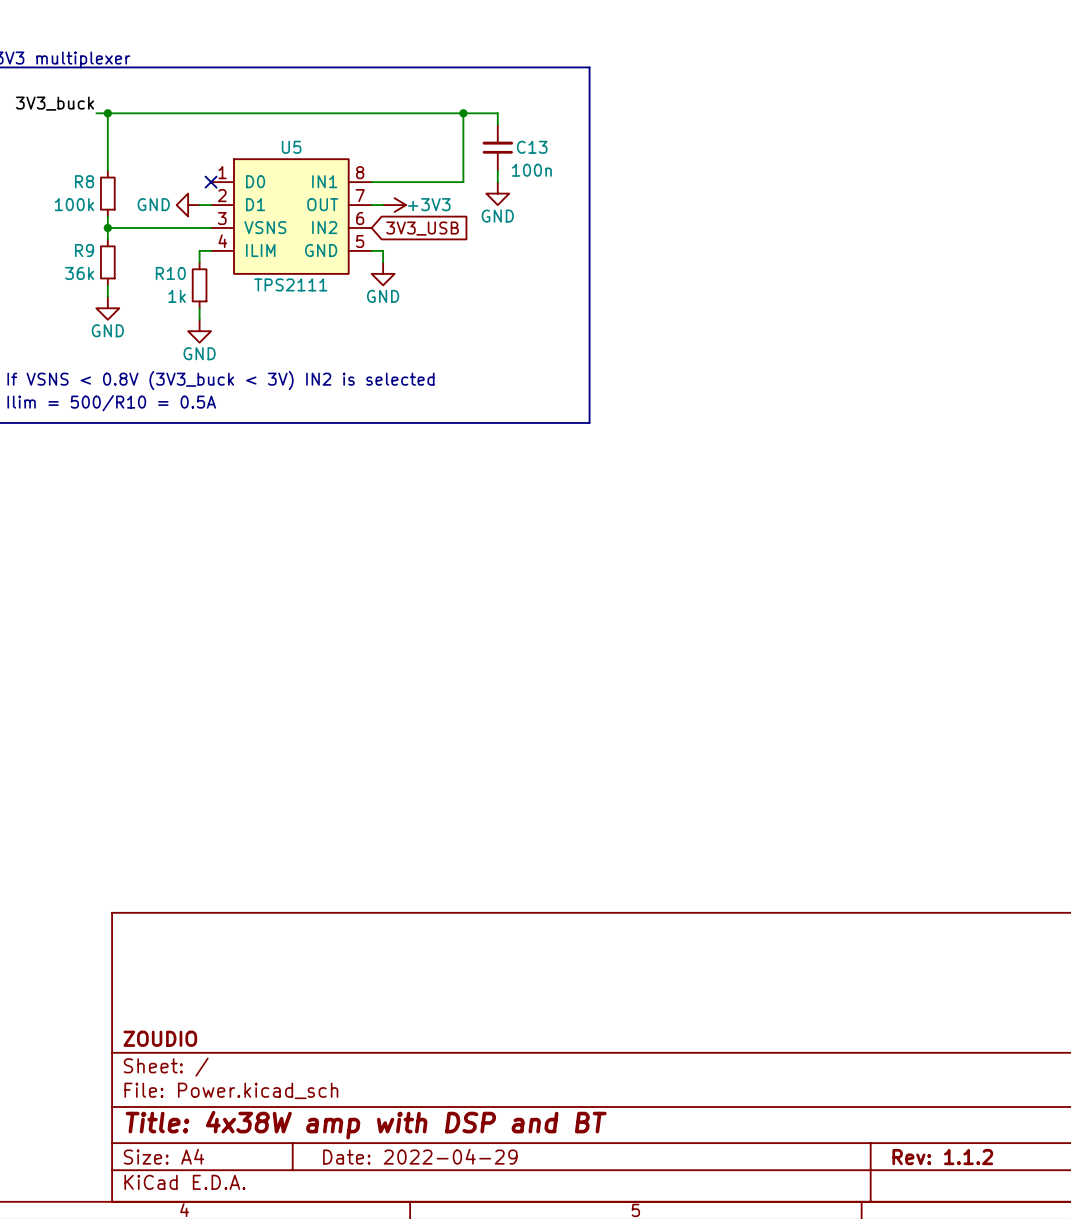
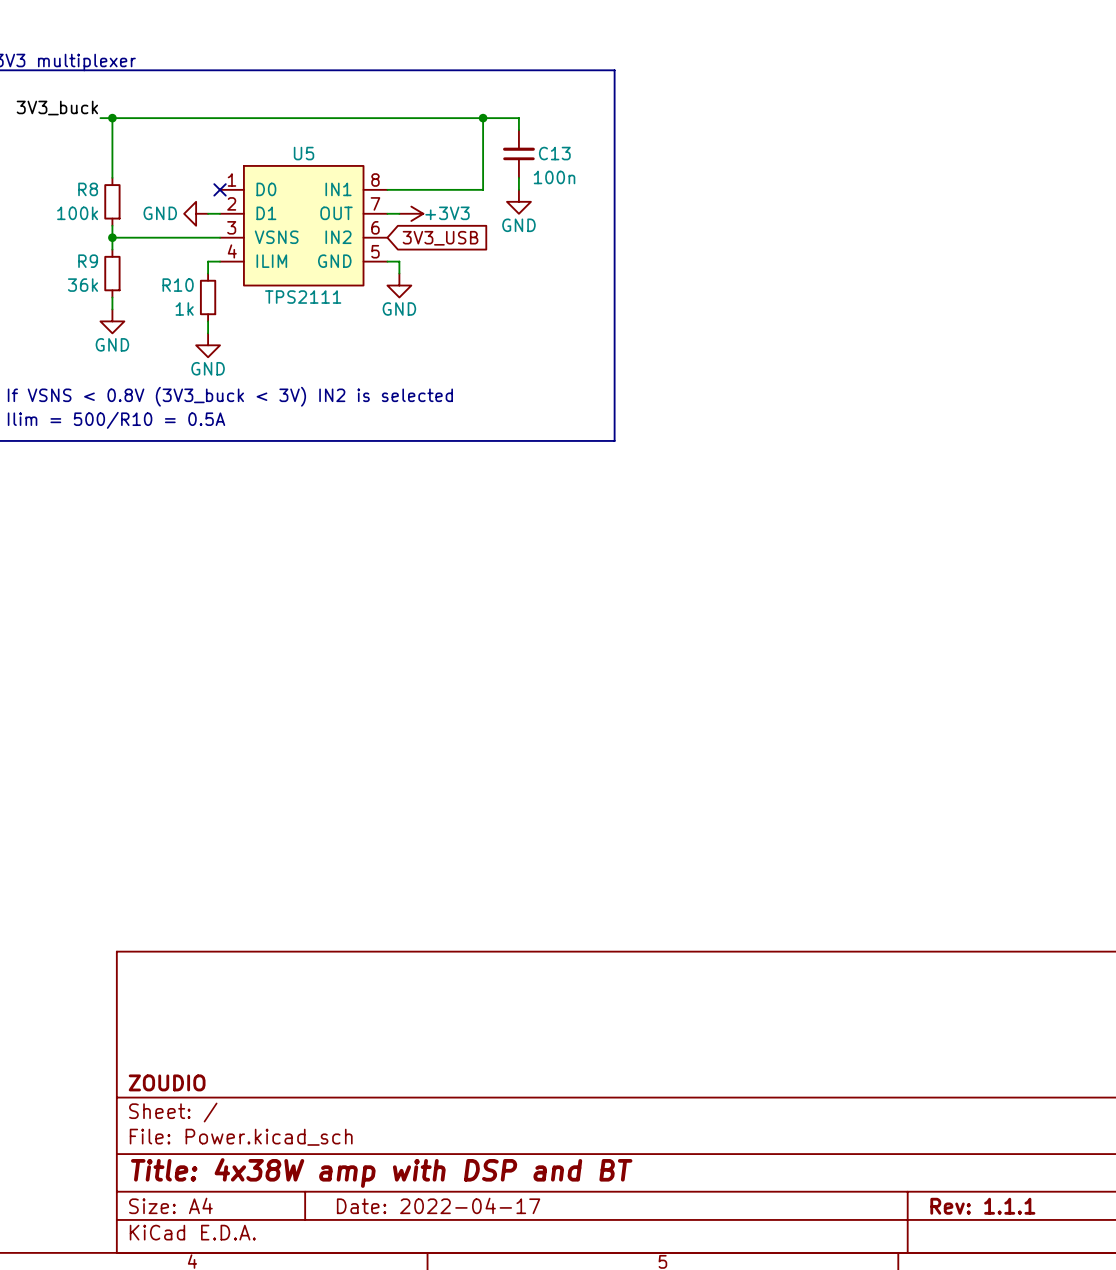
title block: Date: 2022-04-29 (420, 1156) -> Date: 2022-04-17 (438, 1205)
title block: Rev: 1.1.2 (942, 1157) -> Rev: 1.1.1 (982, 1206)

